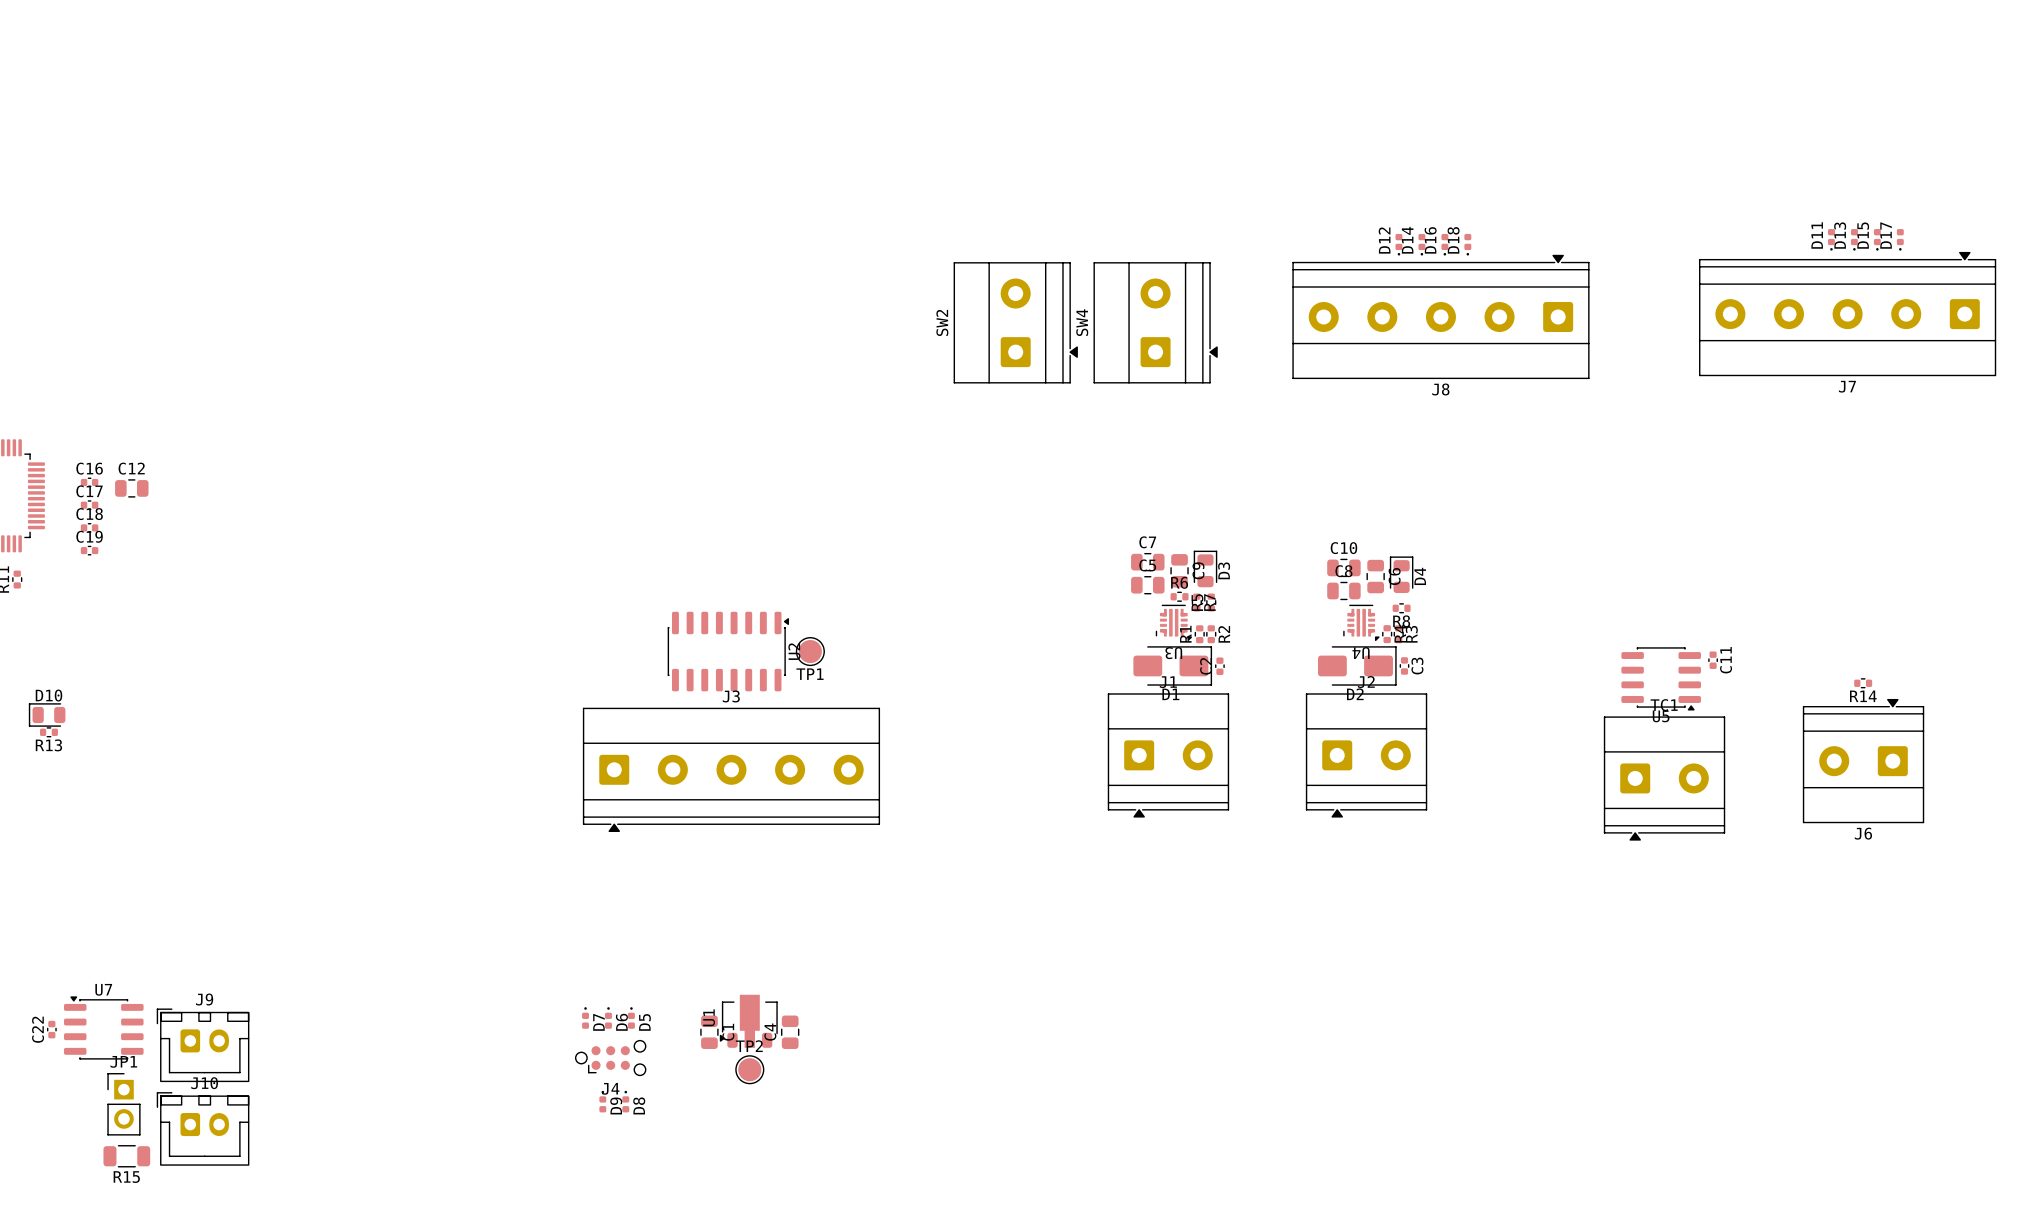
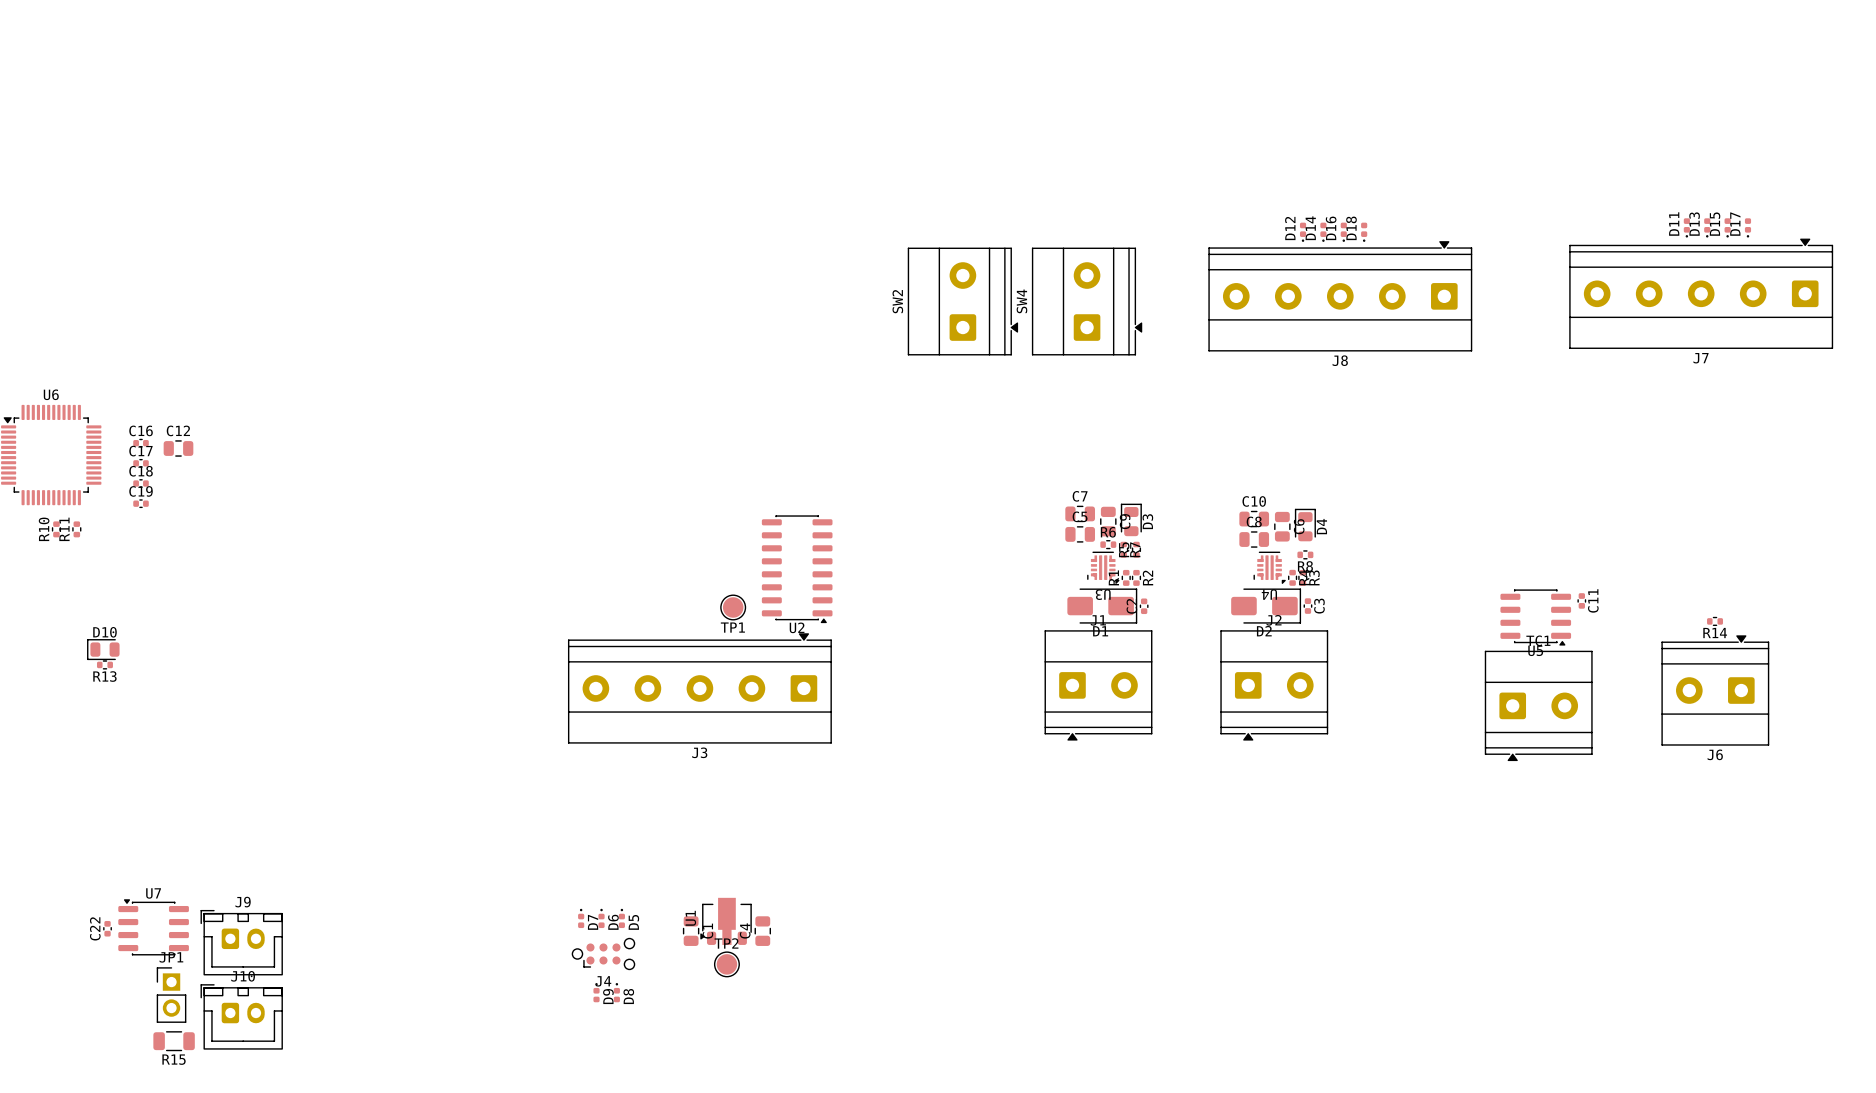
U2 rotation: 0° (728, 651) -> 90° clockwise (797, 569)
U2 position: (728, 651) -> (797, 569)
TP1 position: (810, 651) -> (733, 607)
J3 rotation: 0° (731, 769) -> 180° (699, 688)

